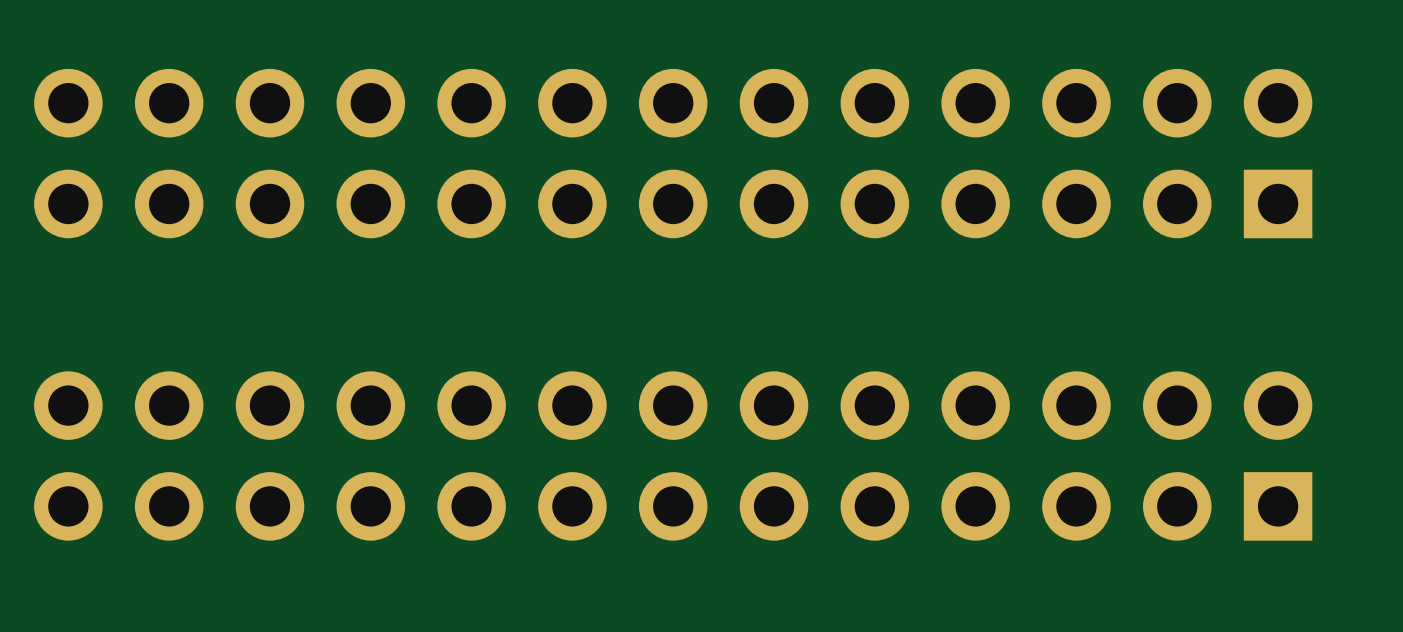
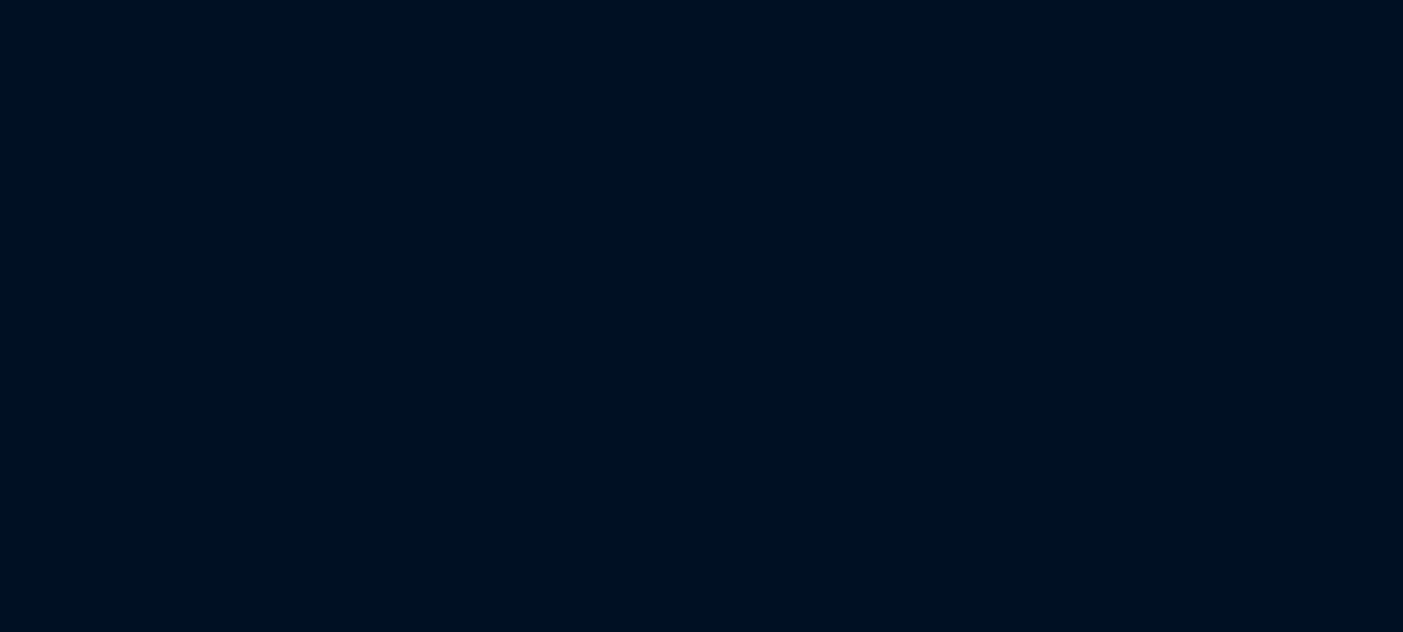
part: (673, 153) -> none
part: (673, 455) -> none

